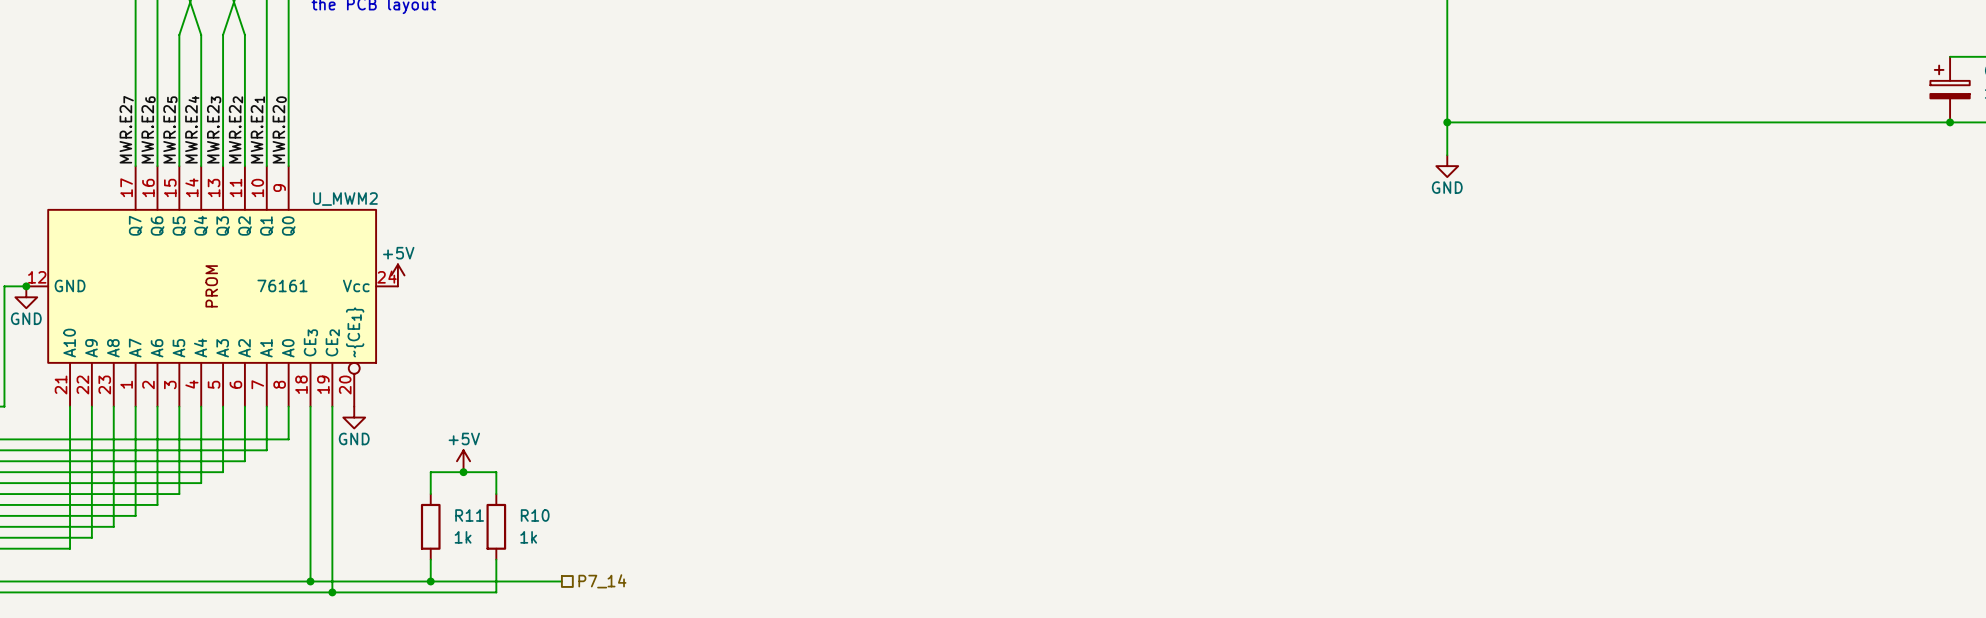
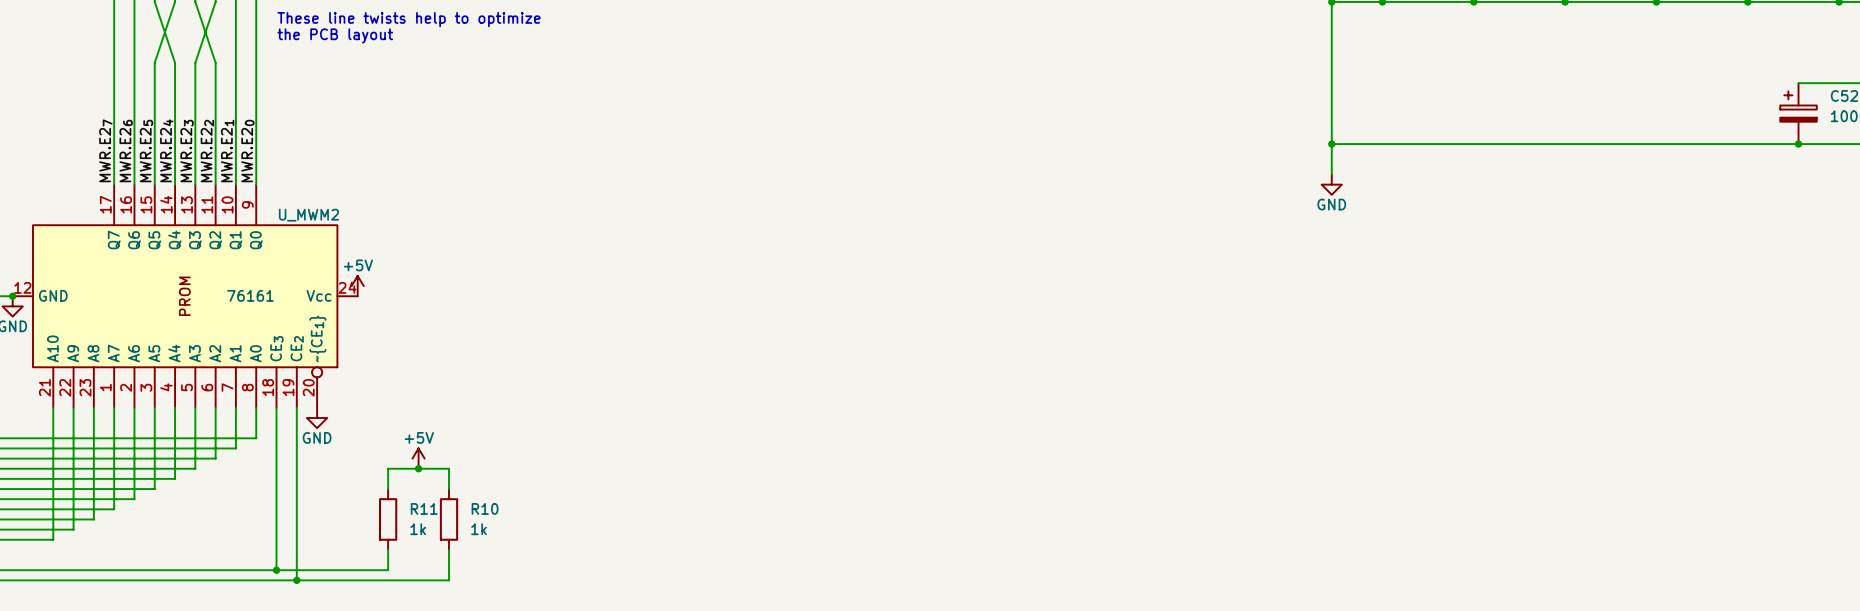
wire: (430, 581) (561, 581) -> none
junction: (430, 581) -> none
hierarchical label: P7_14 (602, 581) -> none

